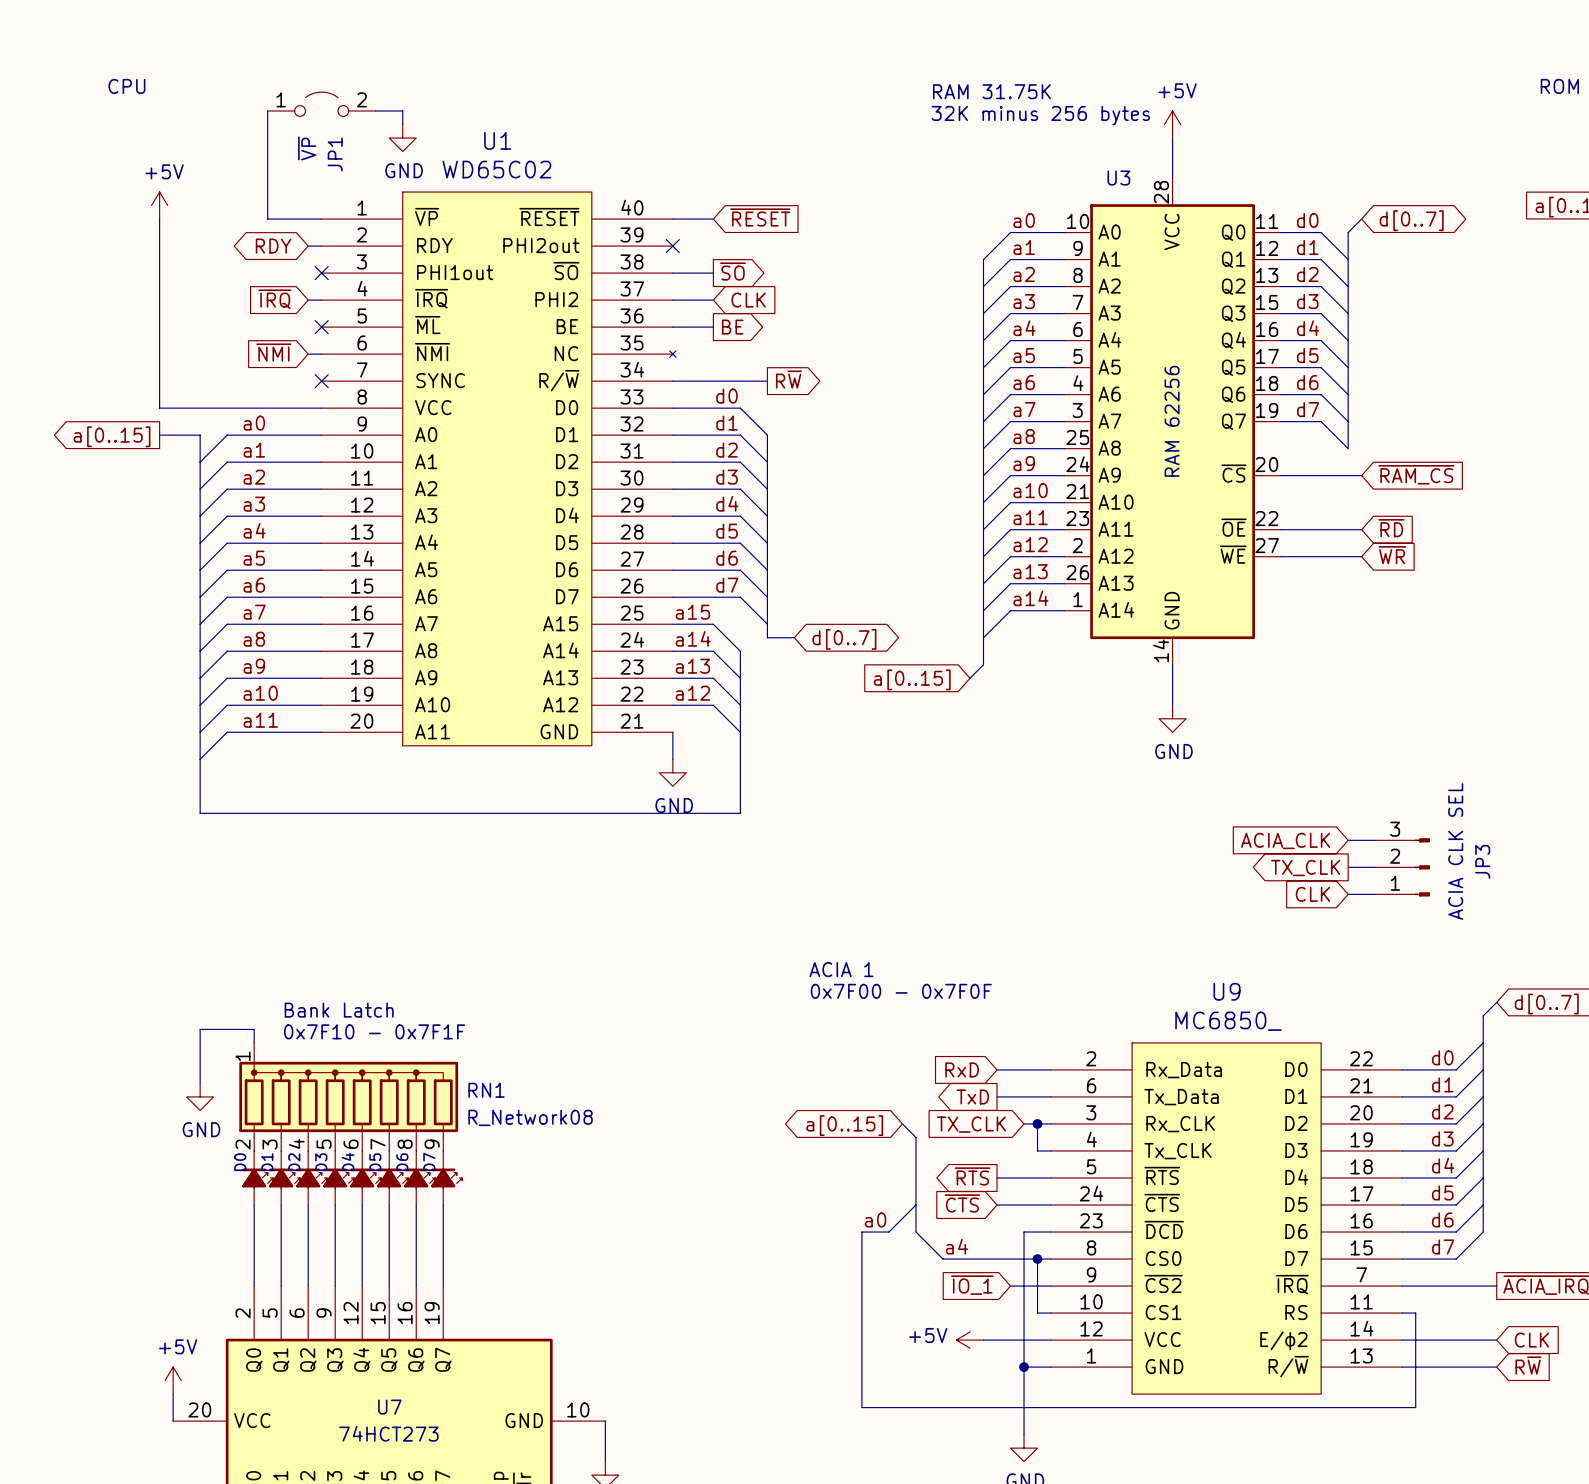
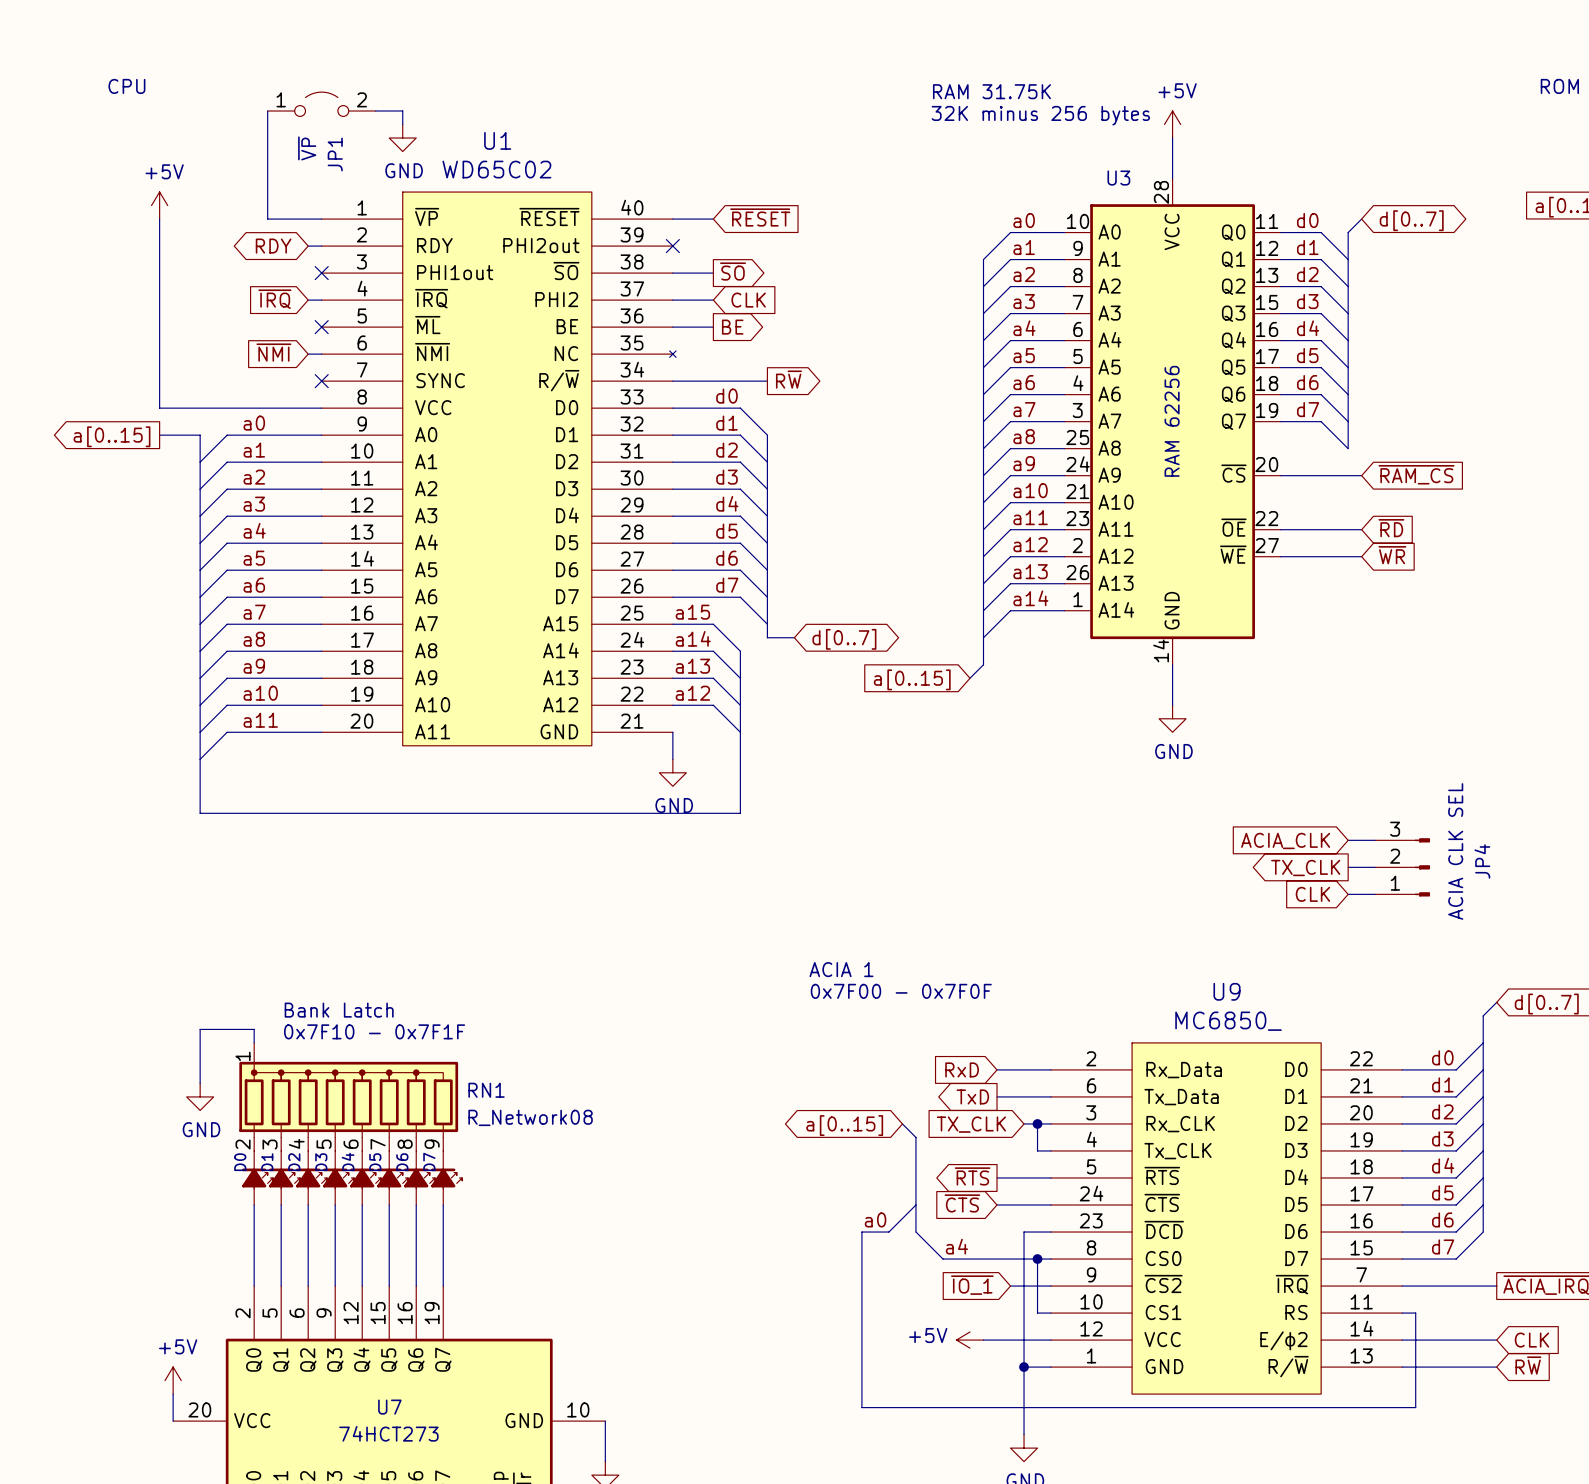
JP3 name: JP3 (1482, 861) -> JP4 (1482, 861)

